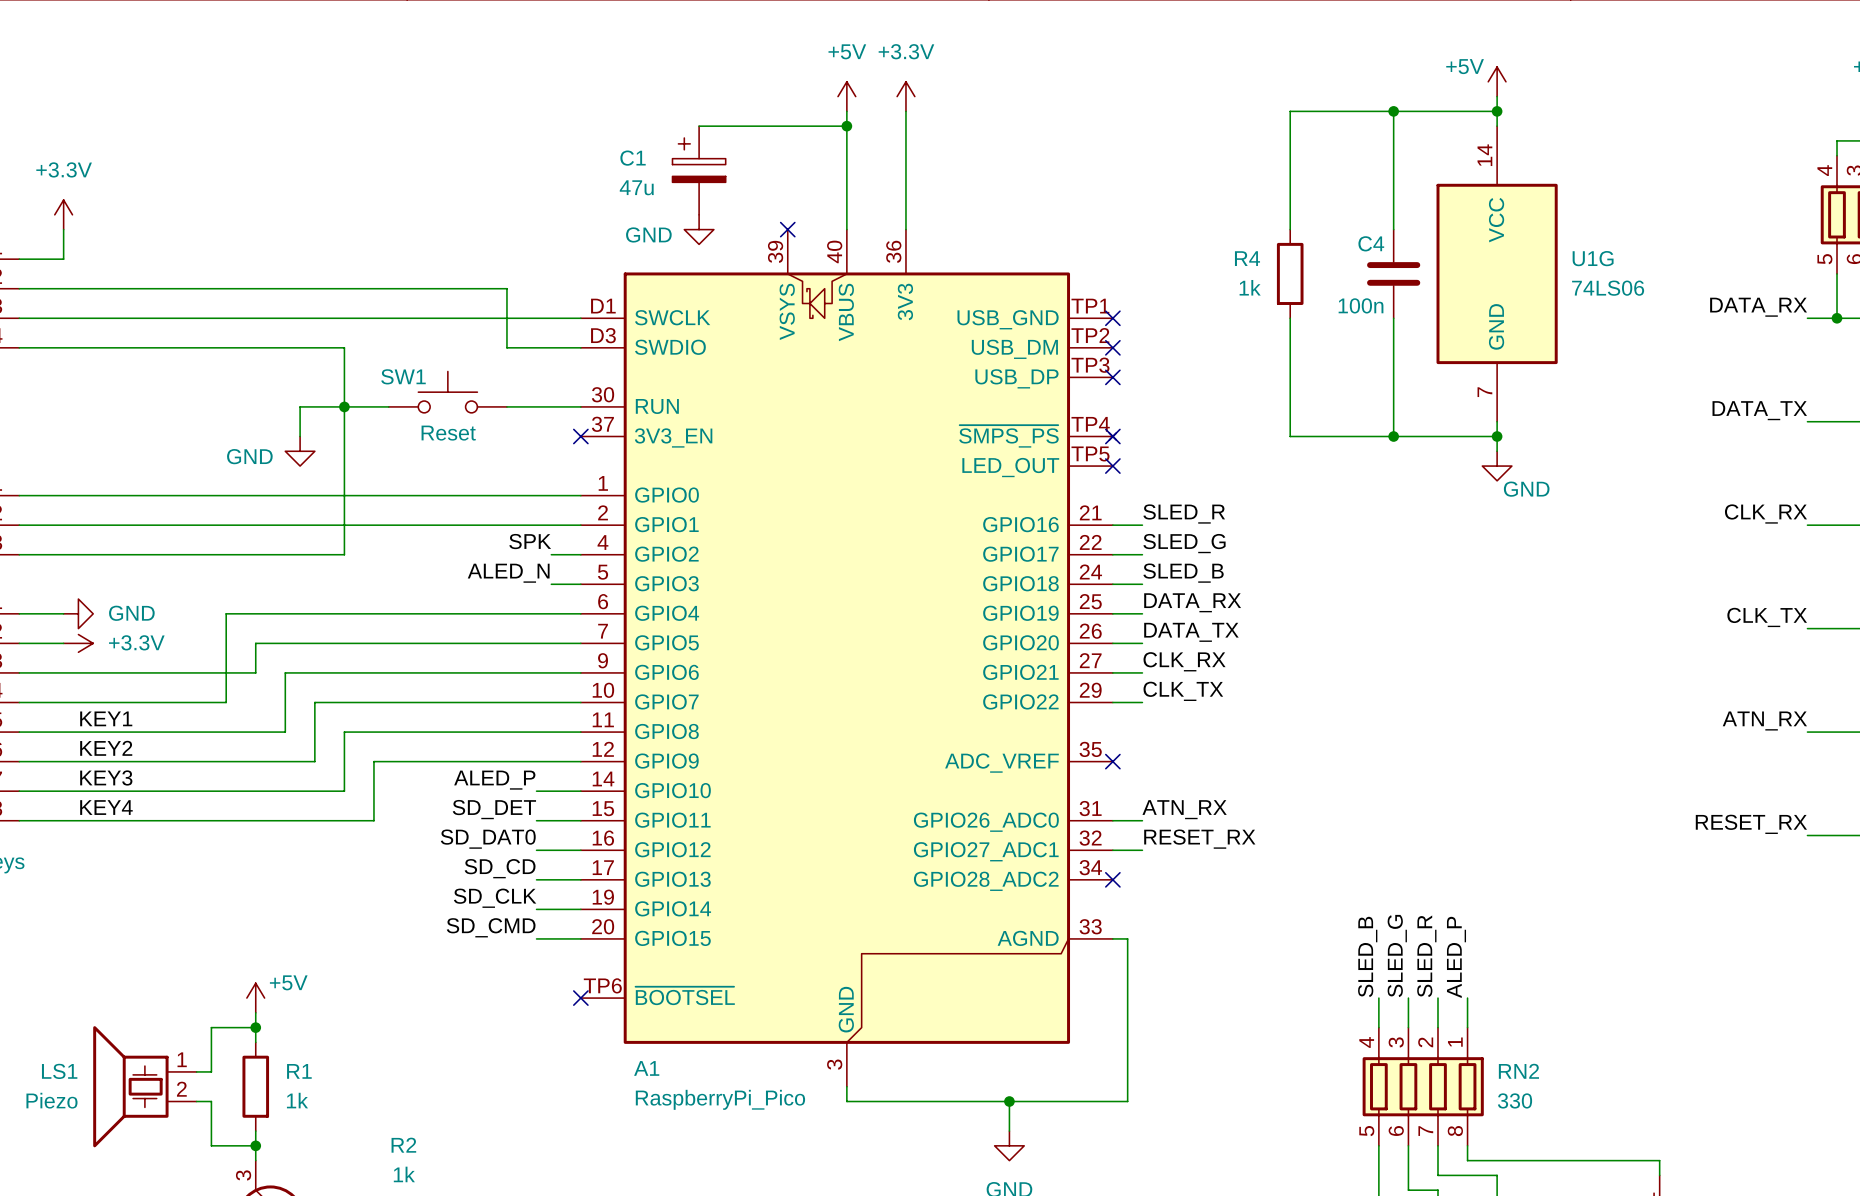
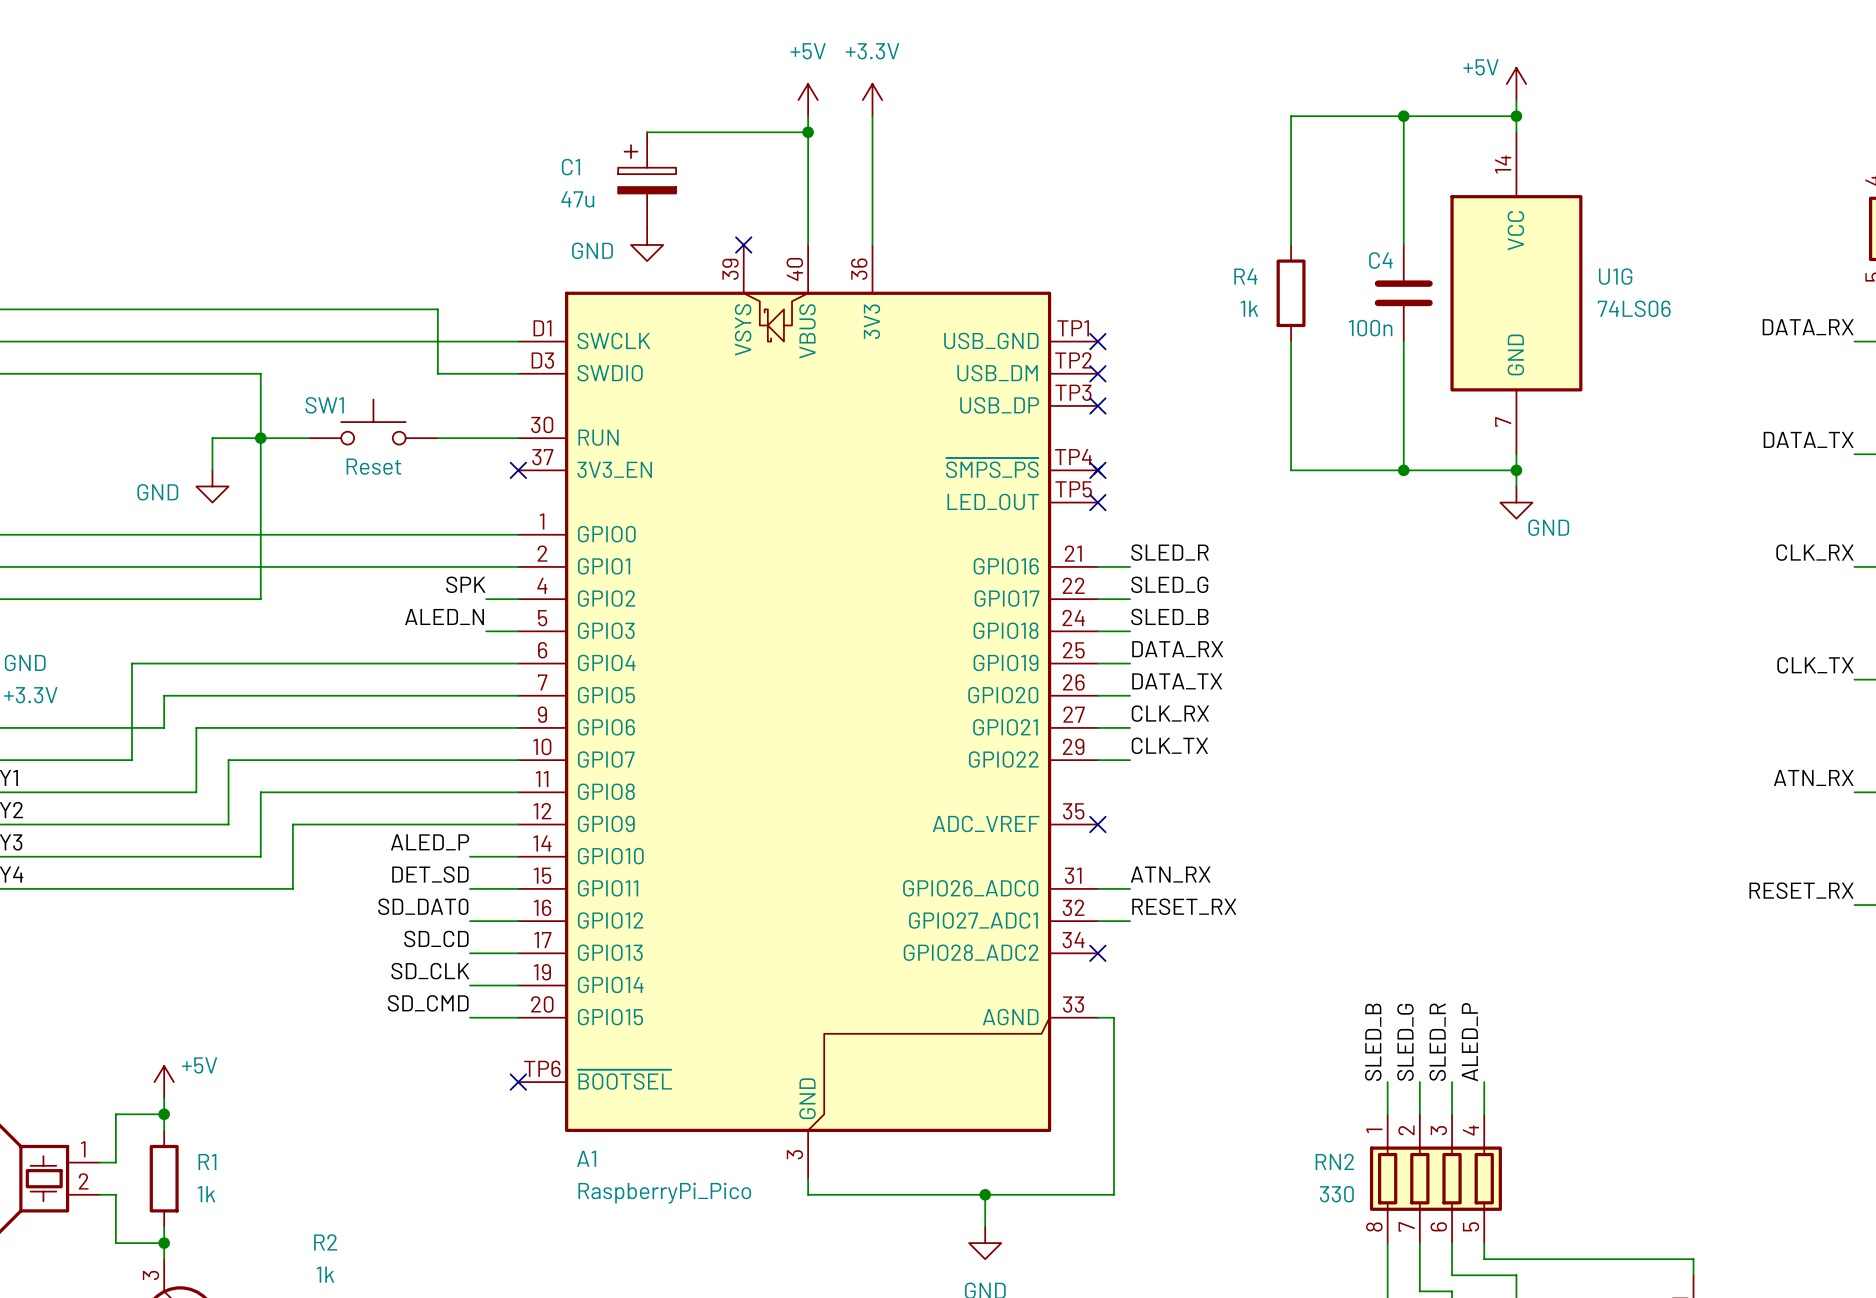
label: SD_DET (494, 809) -> DET_SD (430, 874)
RN2 flip: as is (1423, 1086) -> left-right (1435, 1178)

